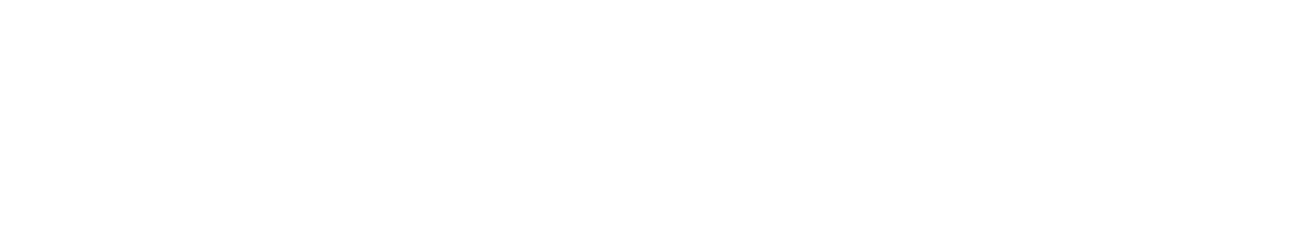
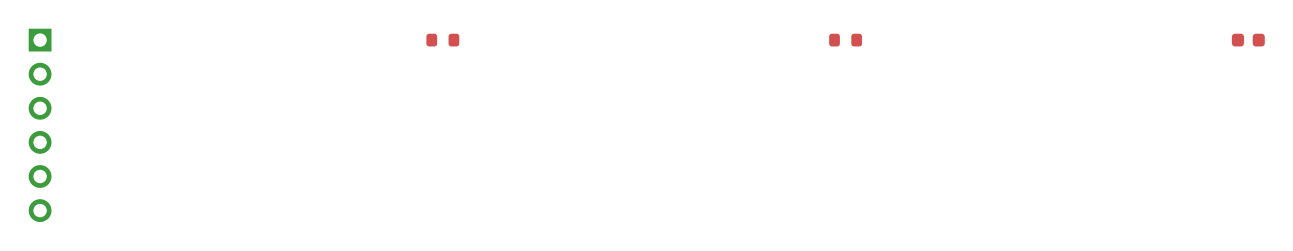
part: none -> (442, 40)
part: none -> (845, 40)
part: none -> (1248, 40)
part: none -> (40, 125)

